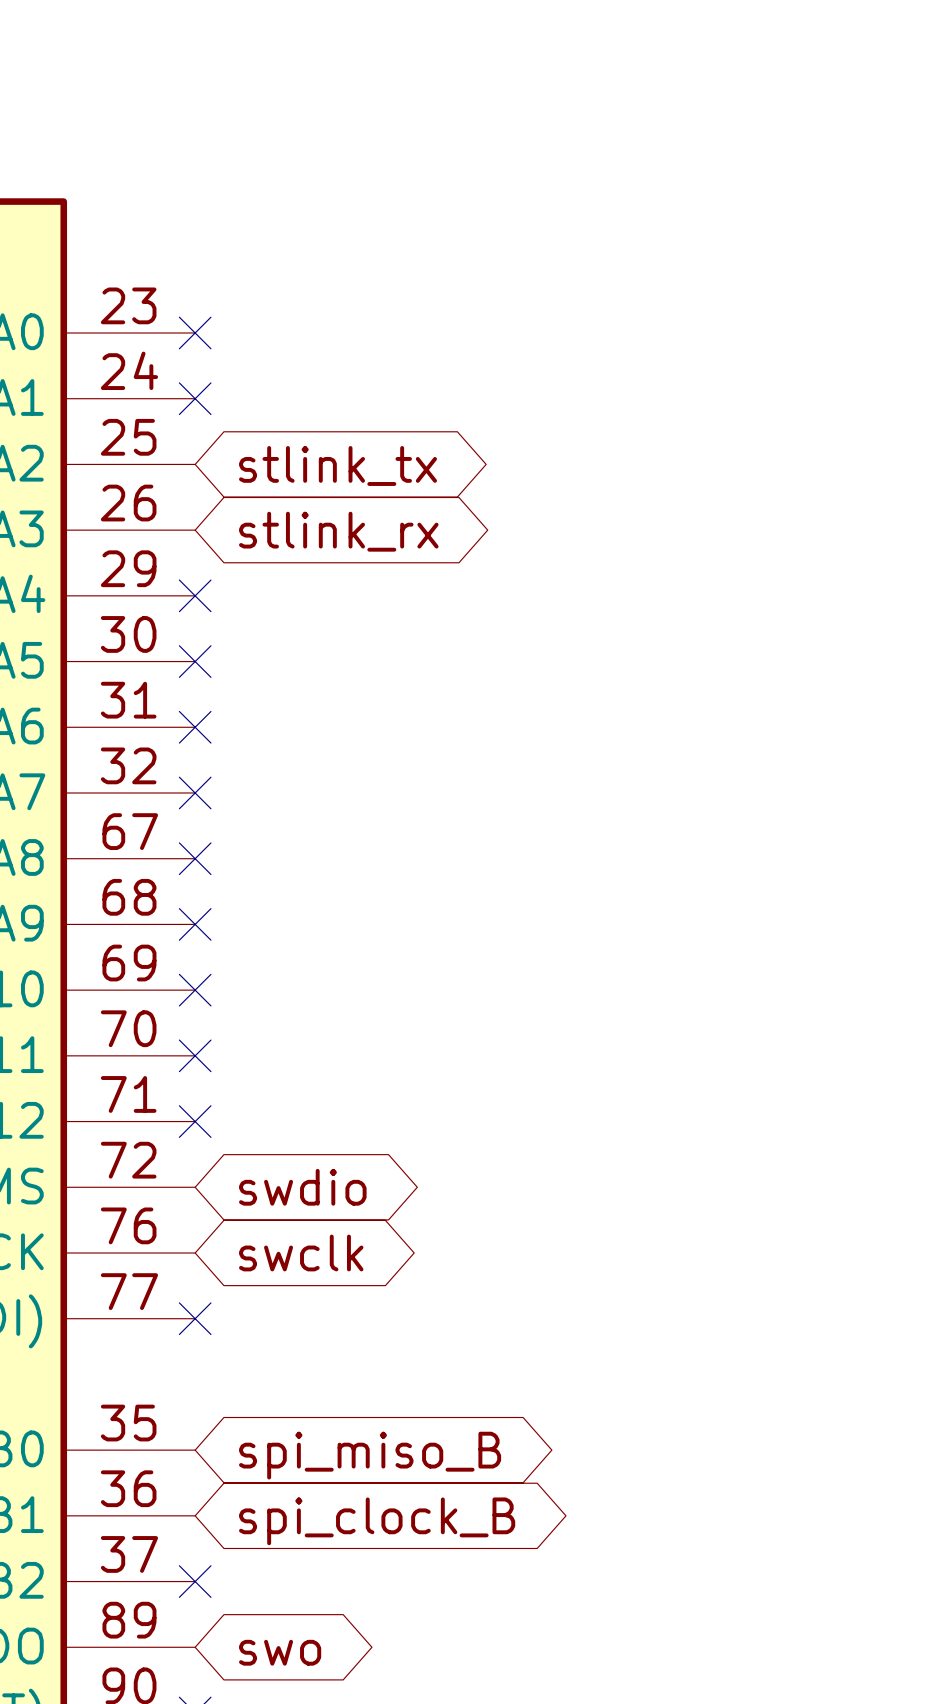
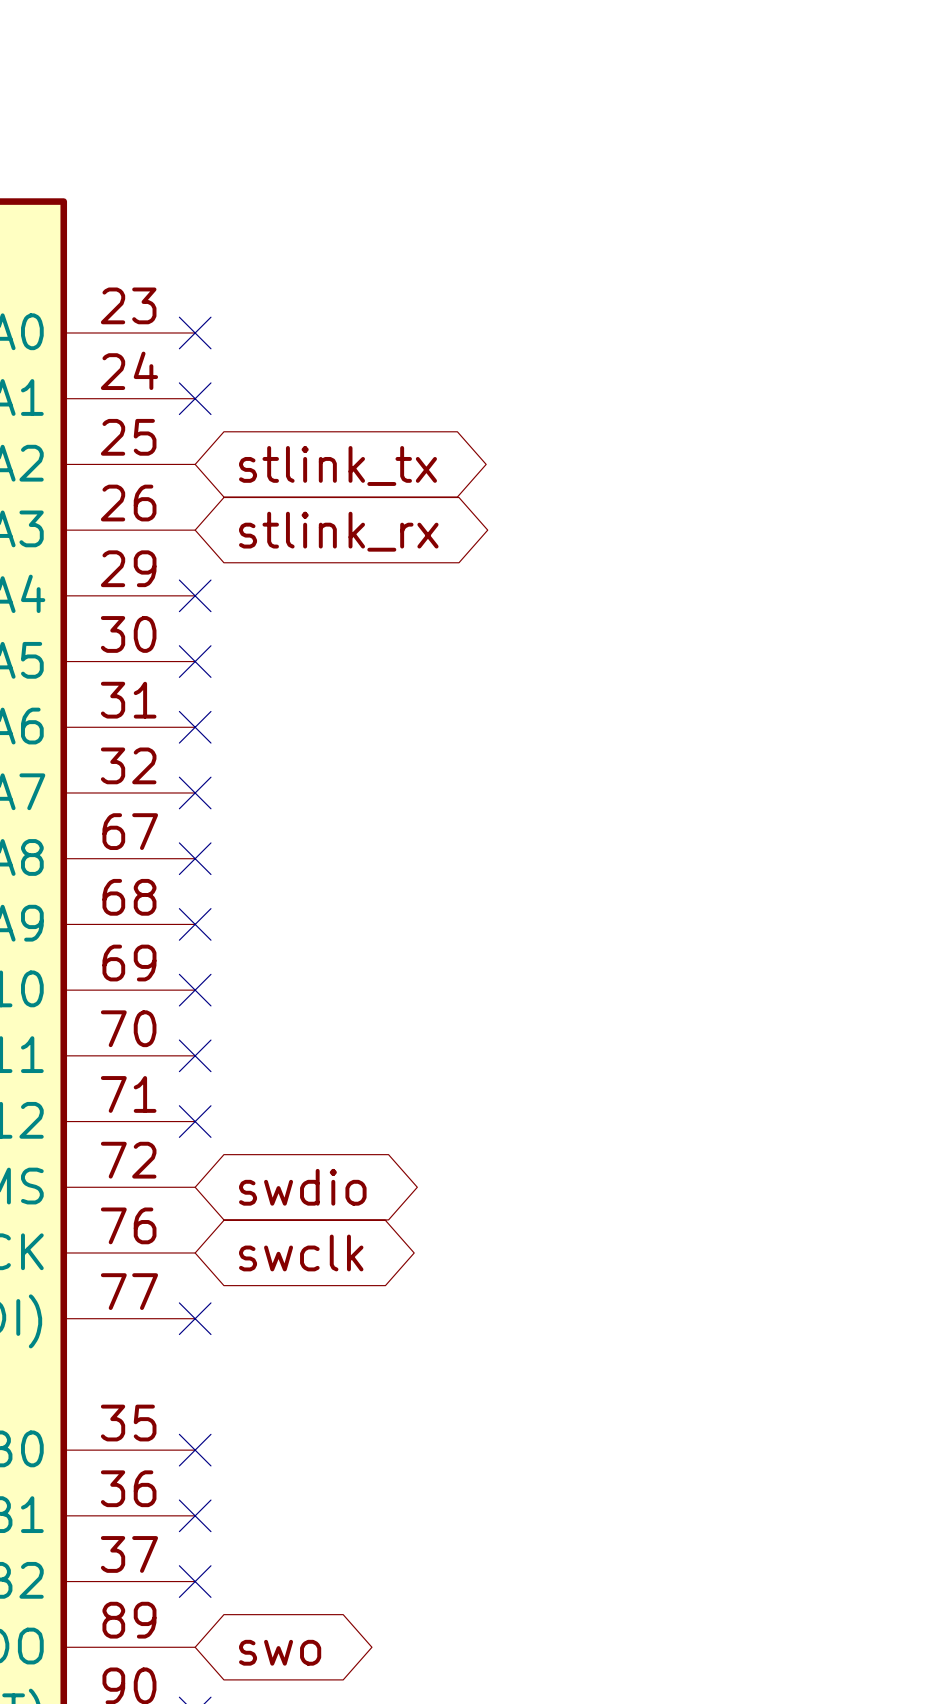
no-connect mark: none -> (195, 1450)
global label: spi_miso_B (370, 1455) -> none
no-connect mark: none -> (195, 1515)
global label: spi_clock_B (377, 1521) -> none

